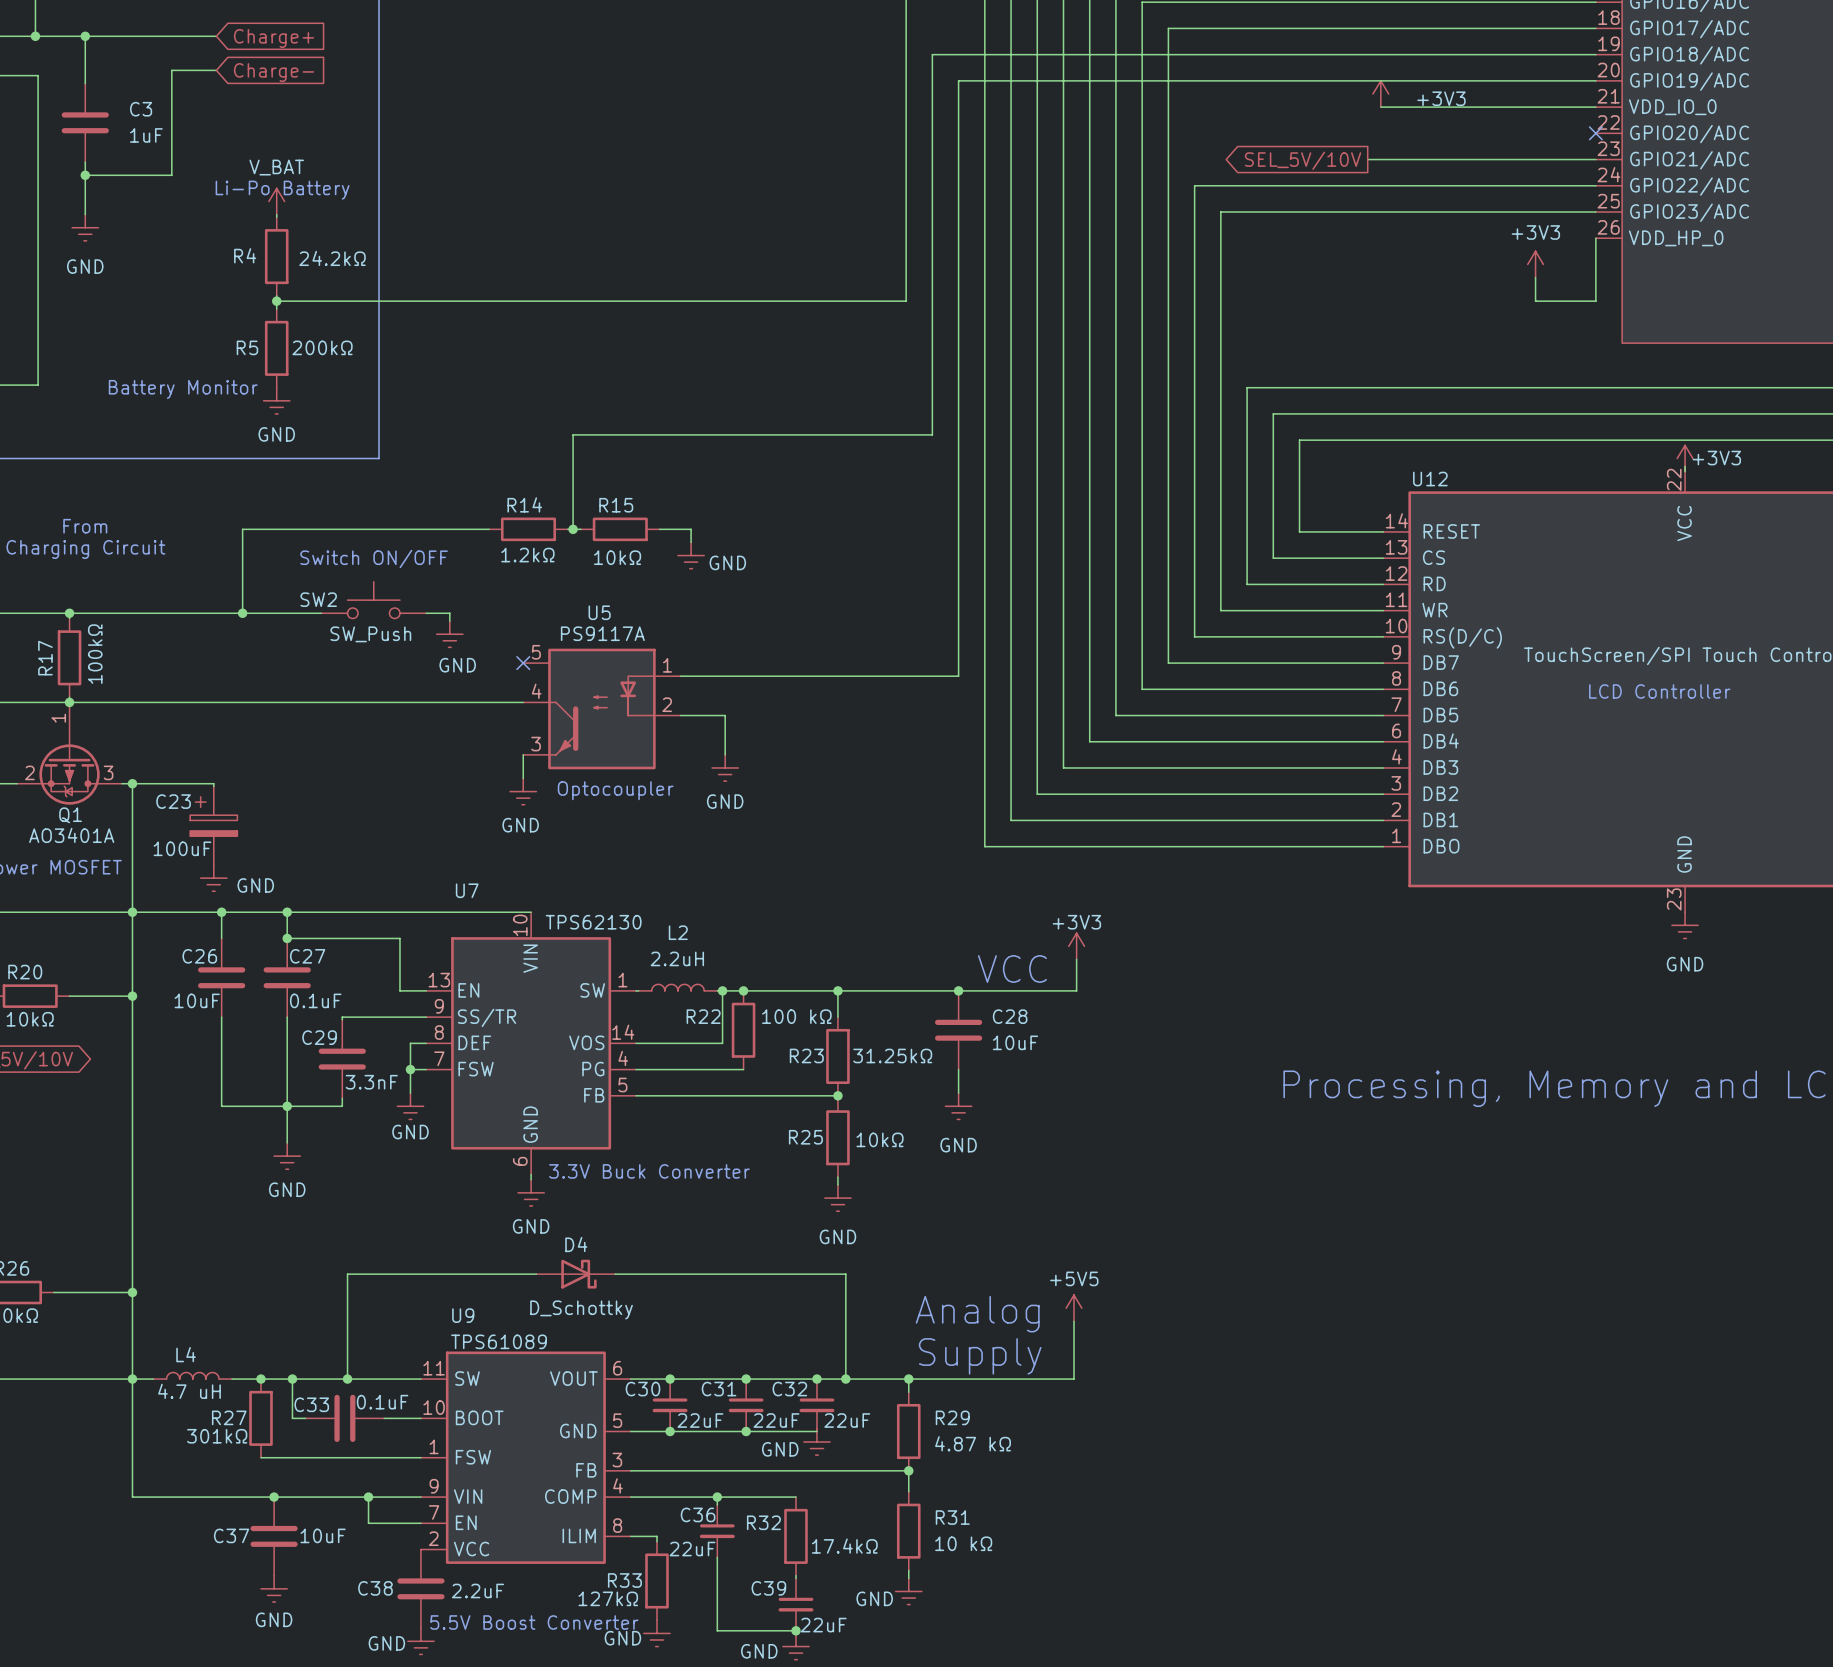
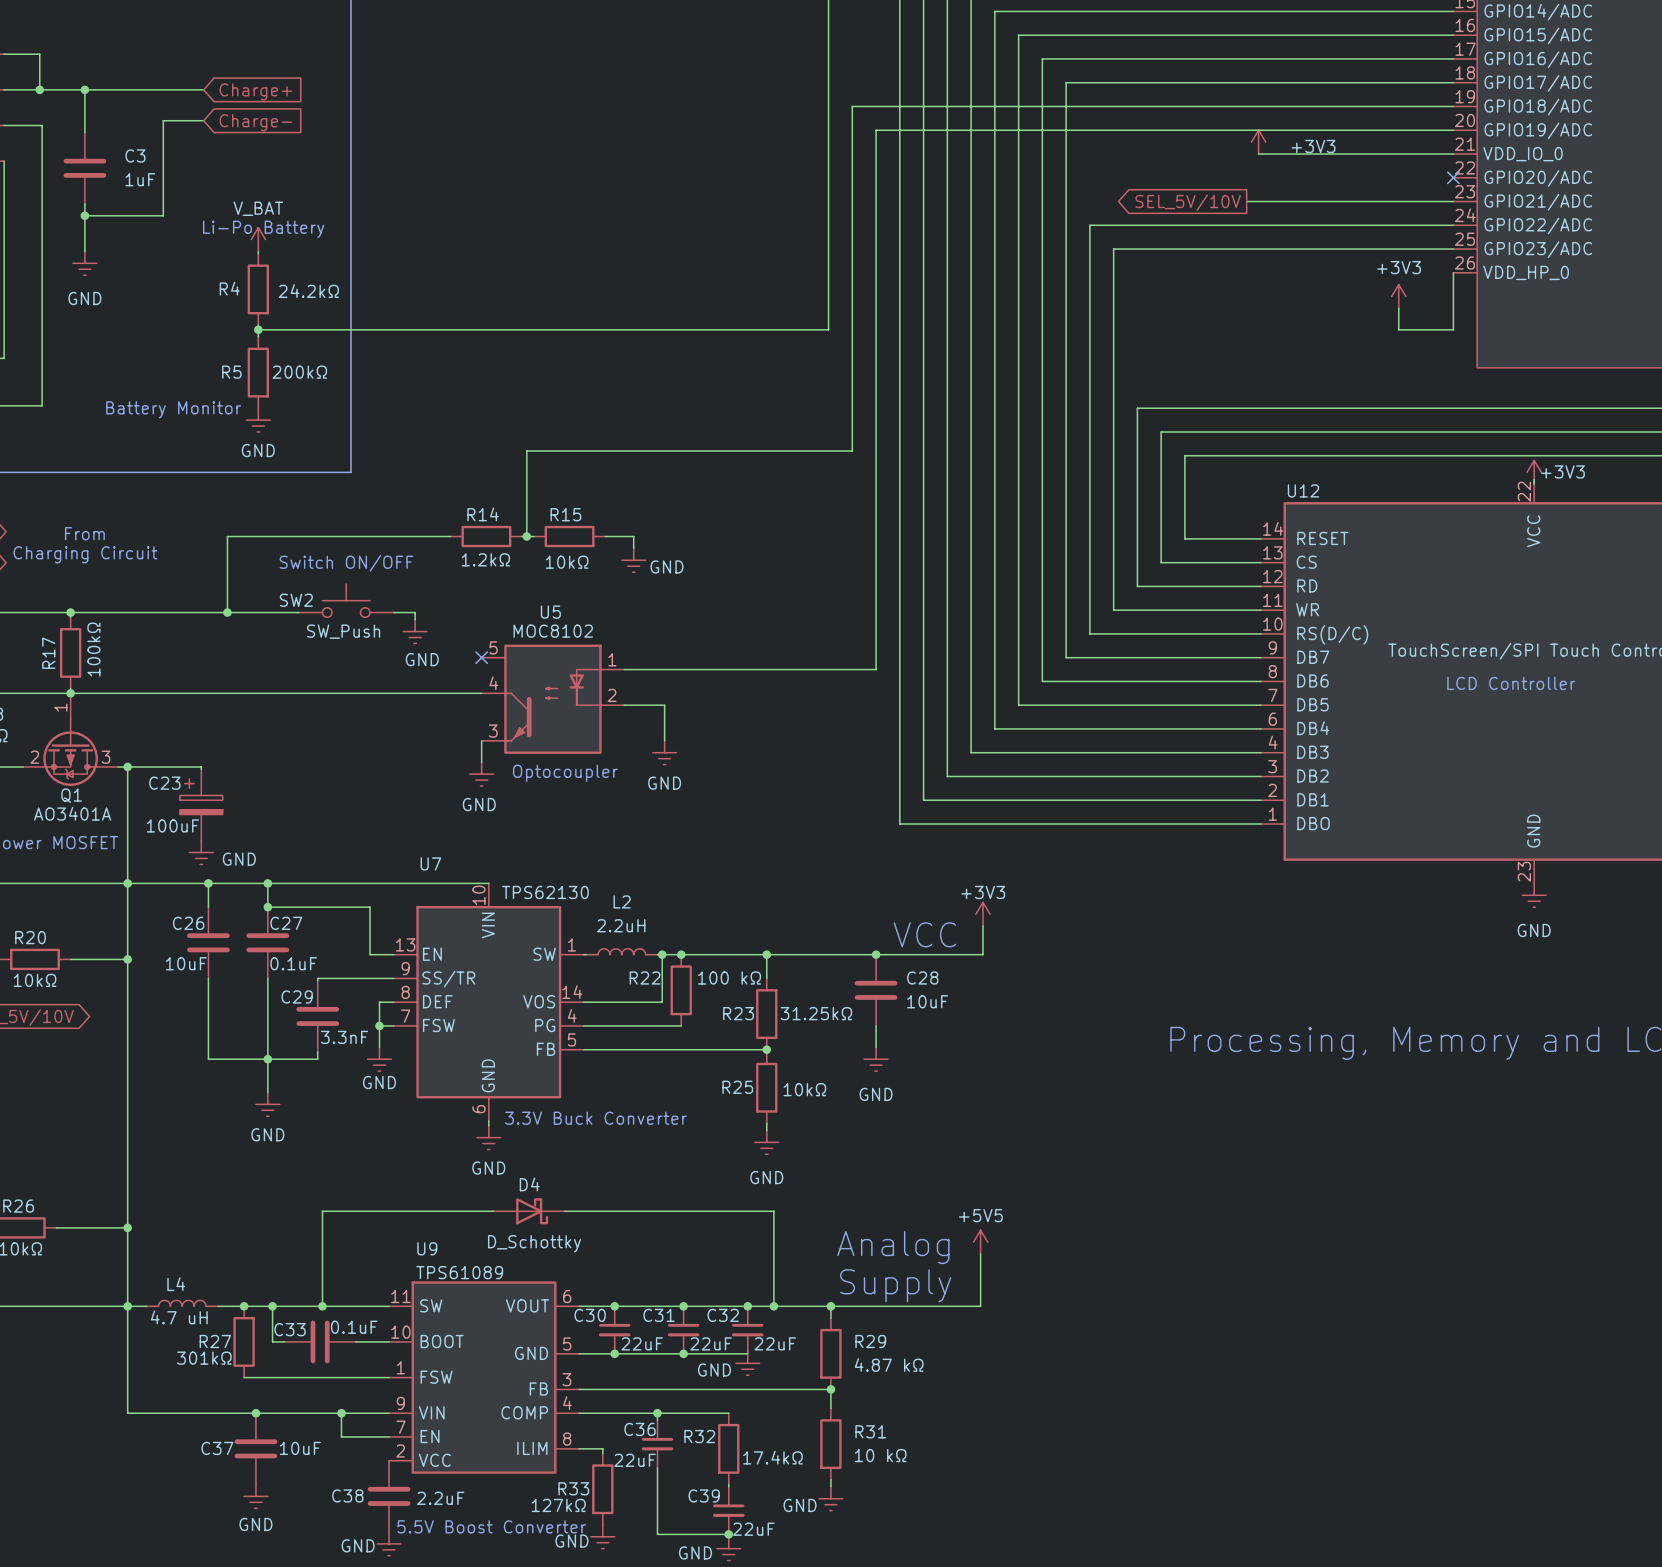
U5 value: PS9117A (602, 633) -> MOC8102 (553, 631)

